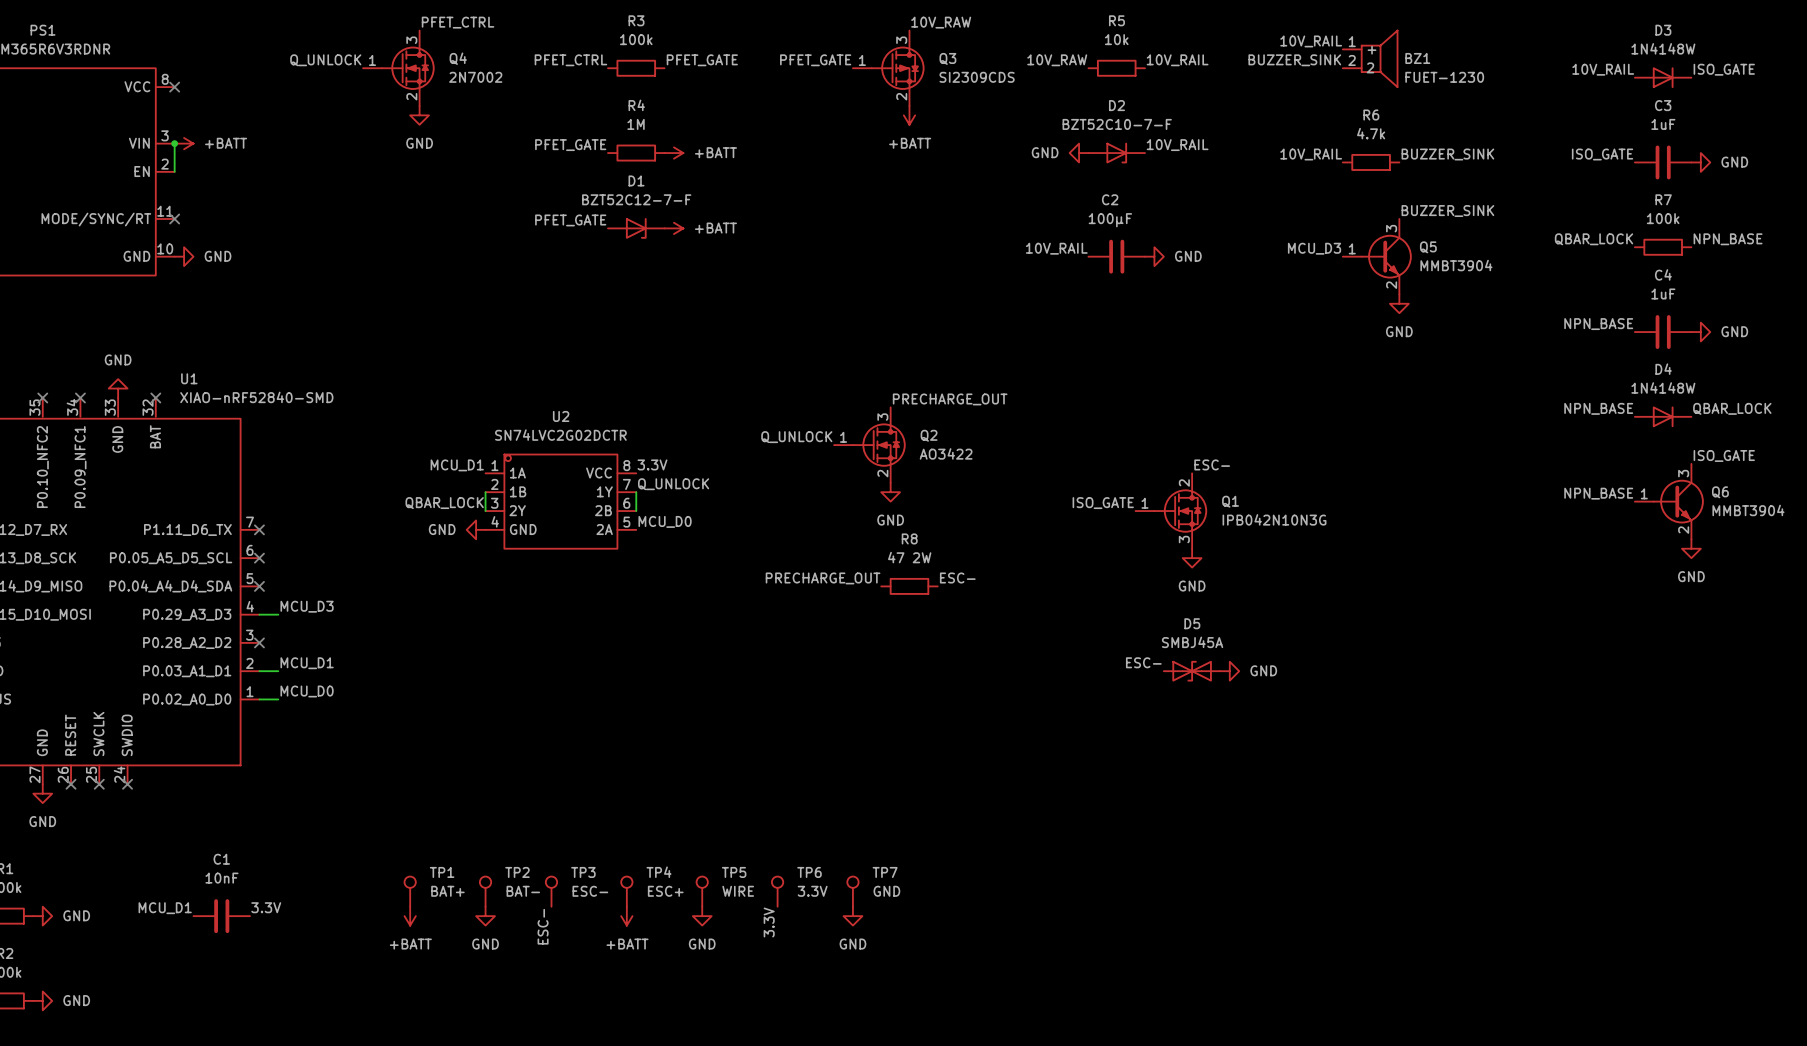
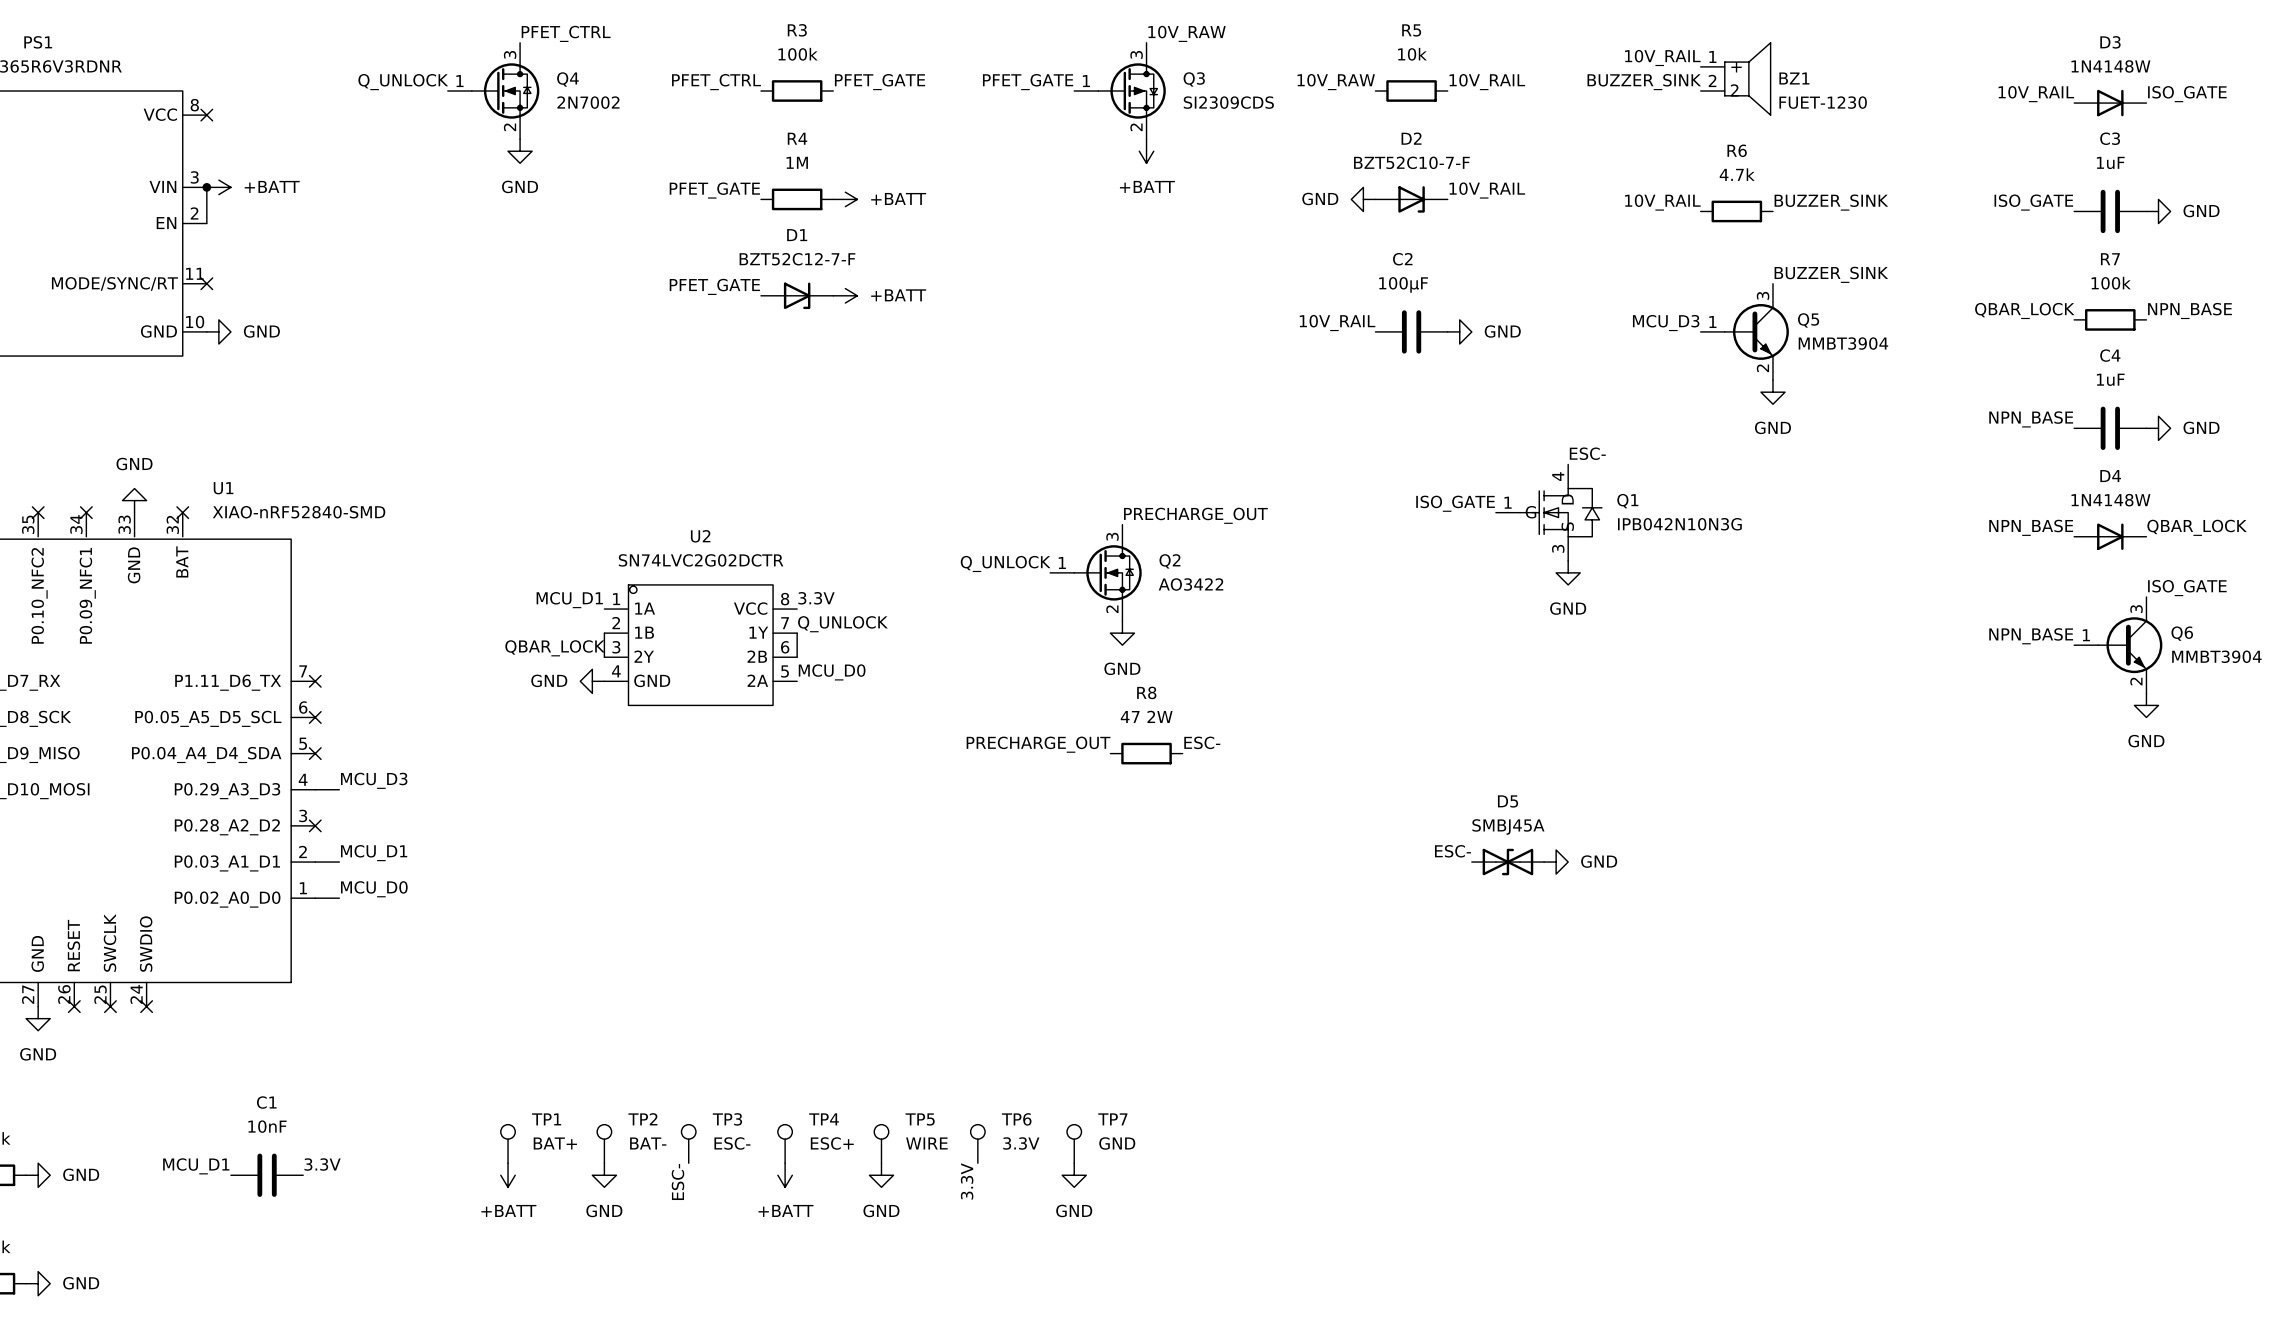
label position: ESC- (1212, 464) -> ESC- (1587, 453)
Q1 symbol: [1135, 473, 1208, 549] -> [1495, 464, 1602, 561]
label position: ISO_GATE (1103, 503) -> ISO_GATE (1455, 503)
power symbol position: GND (1192, 558) -> GND (1568, 572)

